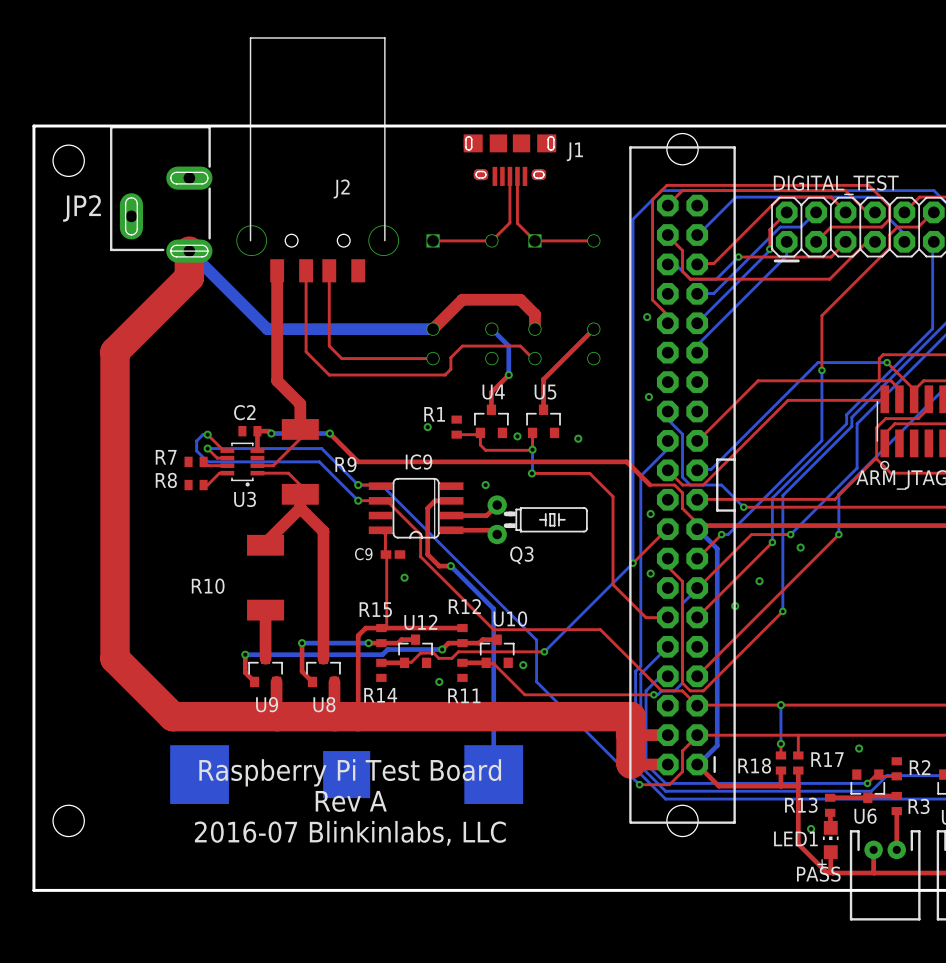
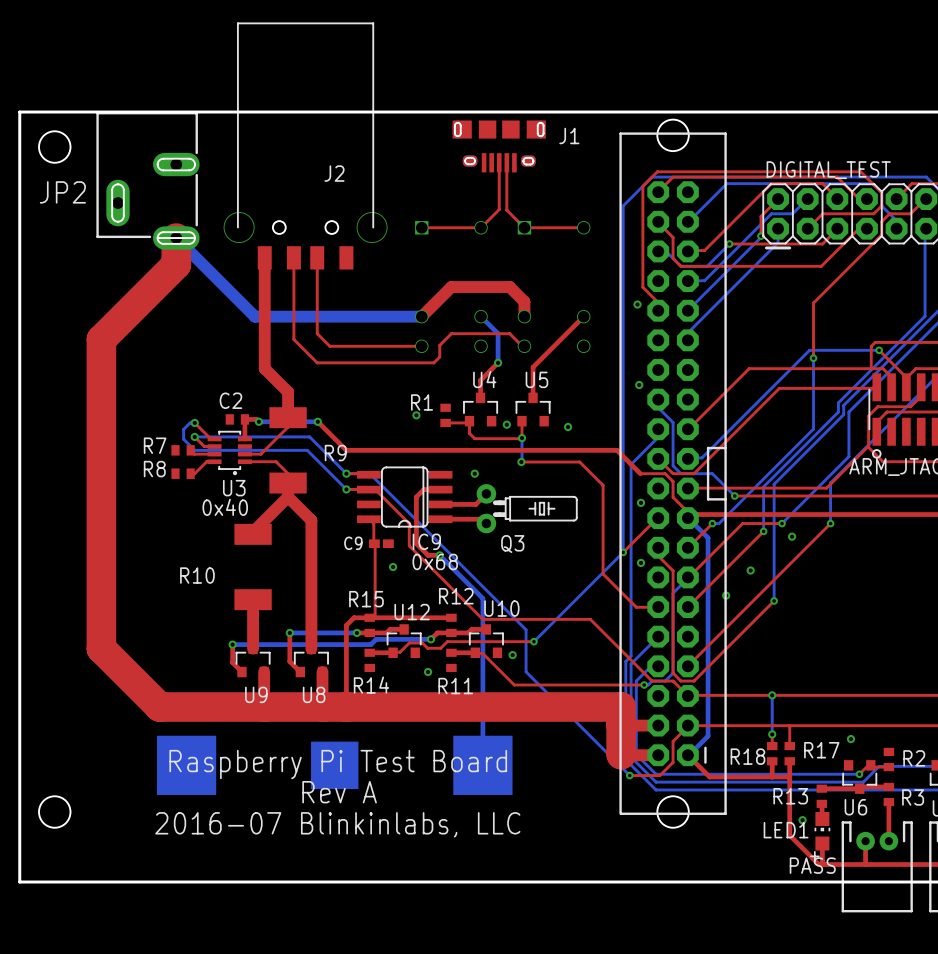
IC9 name position: IC9 (419, 462) -> IC9 (426, 541)
text: none -> 0x40 (225, 507)
text: none -> 0x68 (435, 561)

